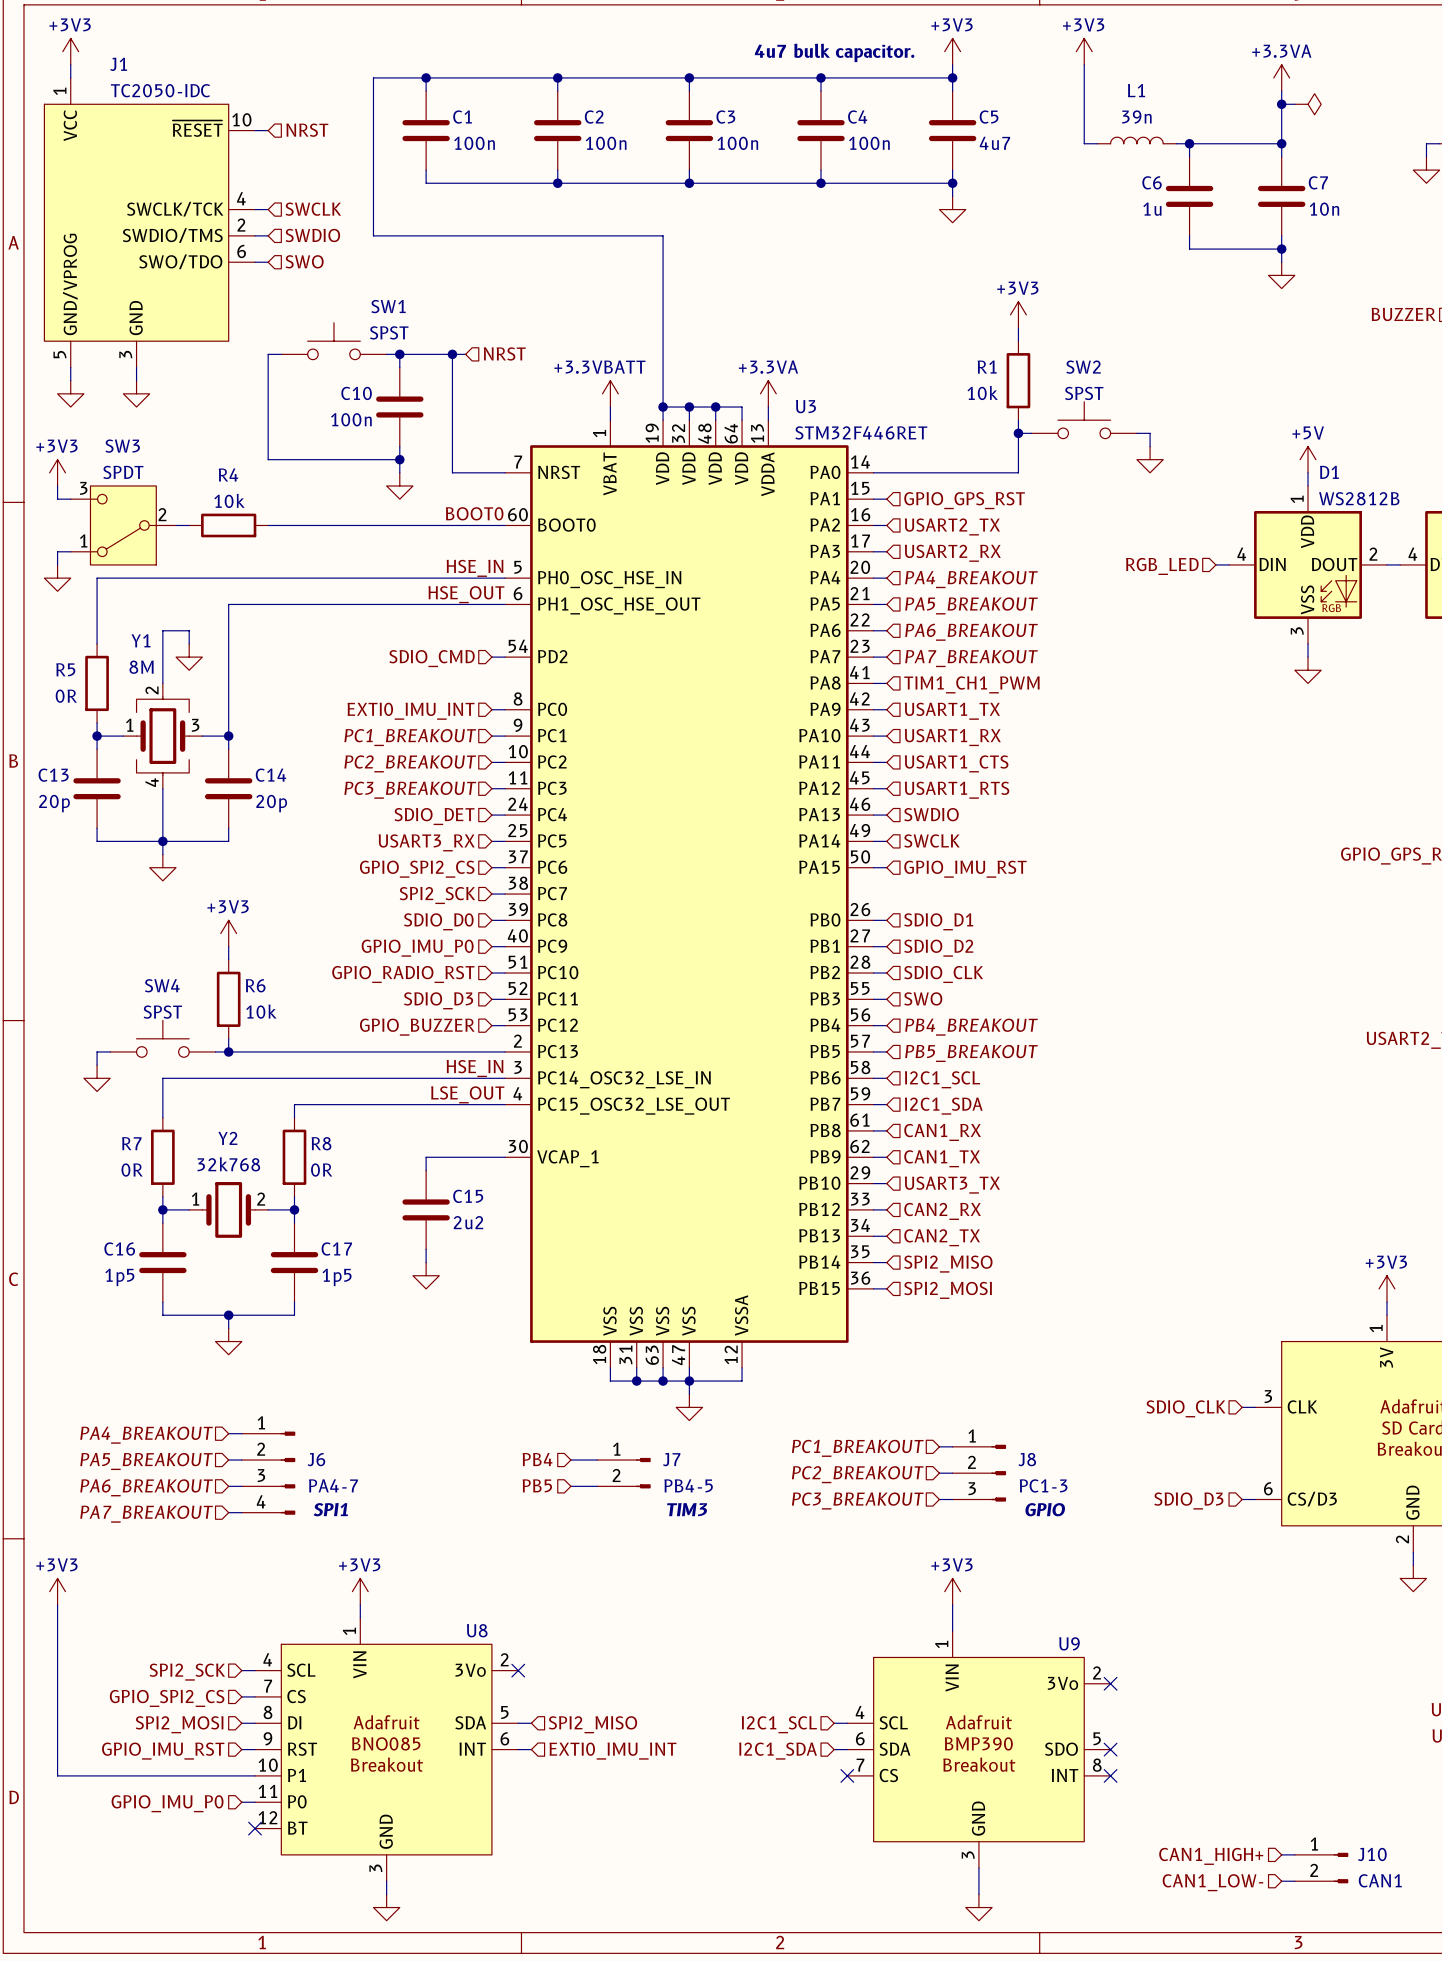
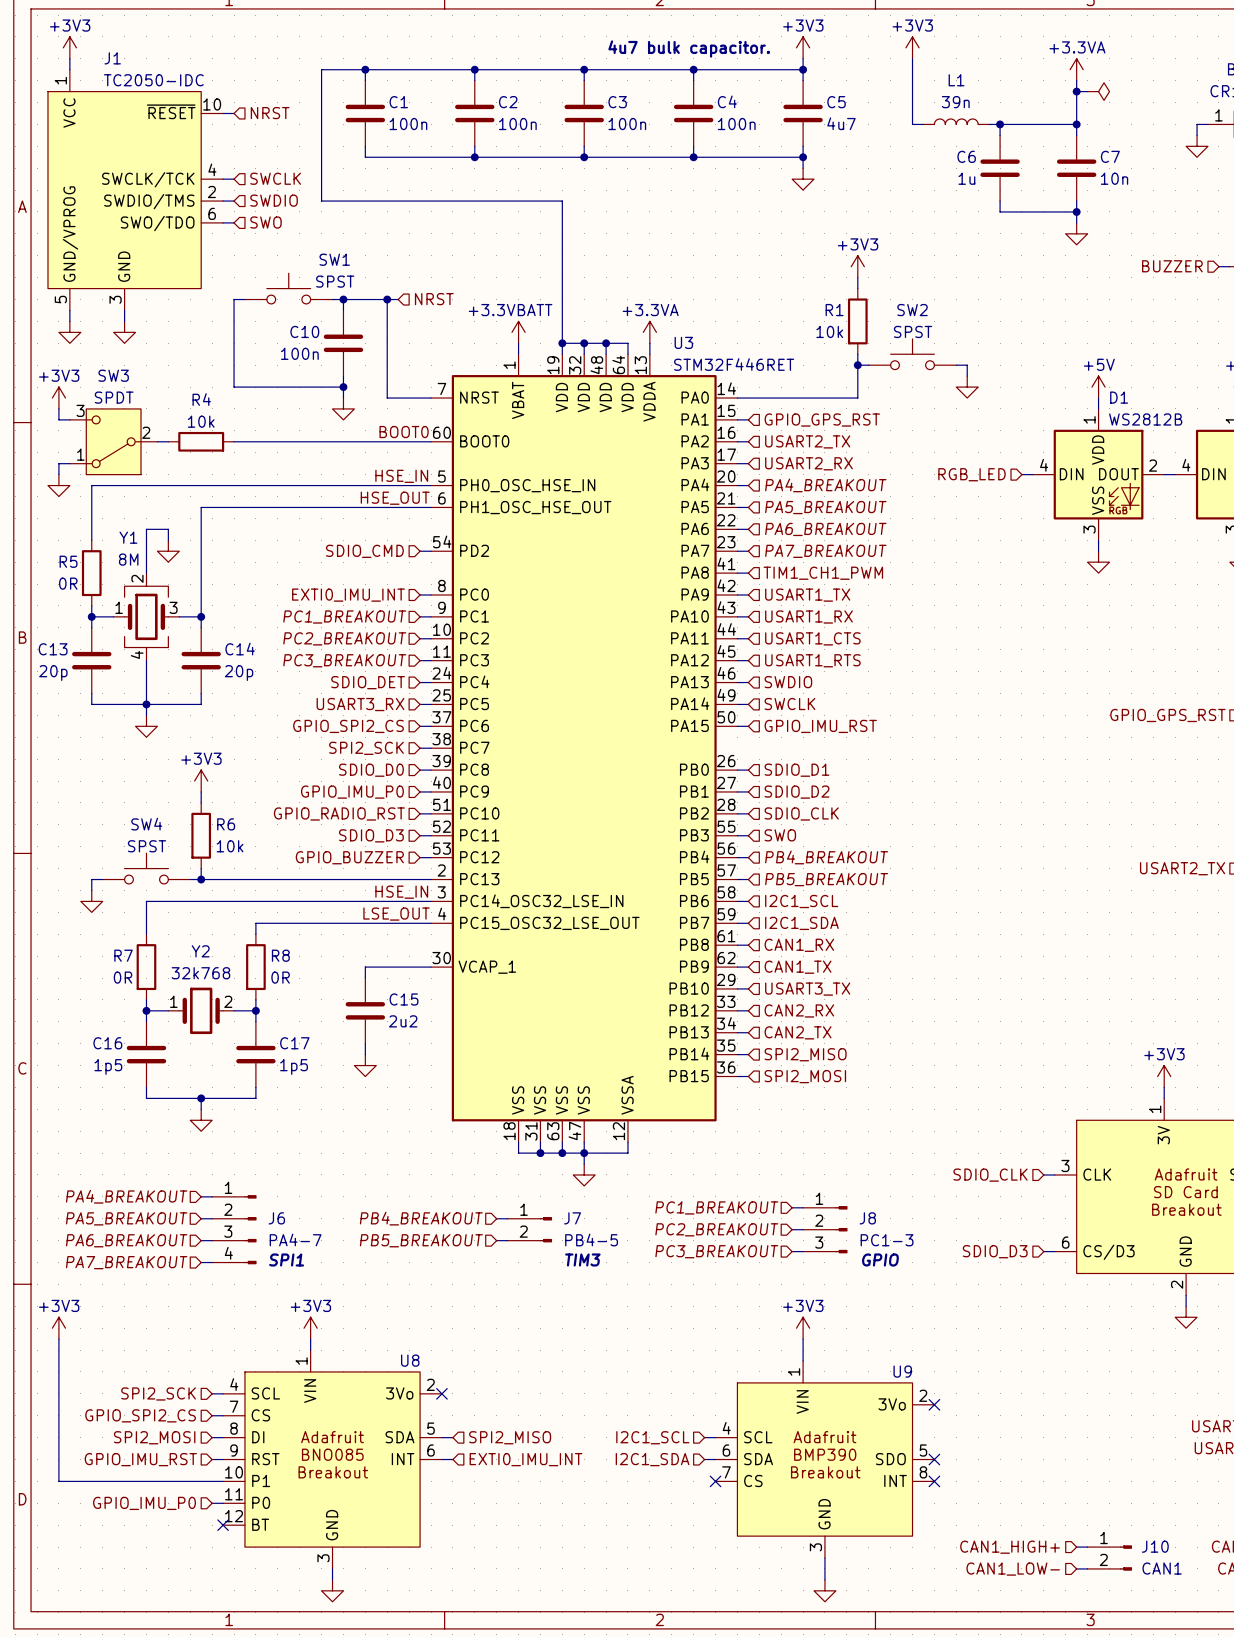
hierarchical label: PB4 (537, 1459) -> none
wire: (570, 1460) (584, 1460) -> none
hierarchical label: none -> PB4_BREAKOUT (421, 1218)
hierarchical label: PB5 (537, 1485) -> none
wire: (570, 1486) (584, 1486) -> none
hierarchical label: none -> PB5_BREAKOUT (421, 1240)

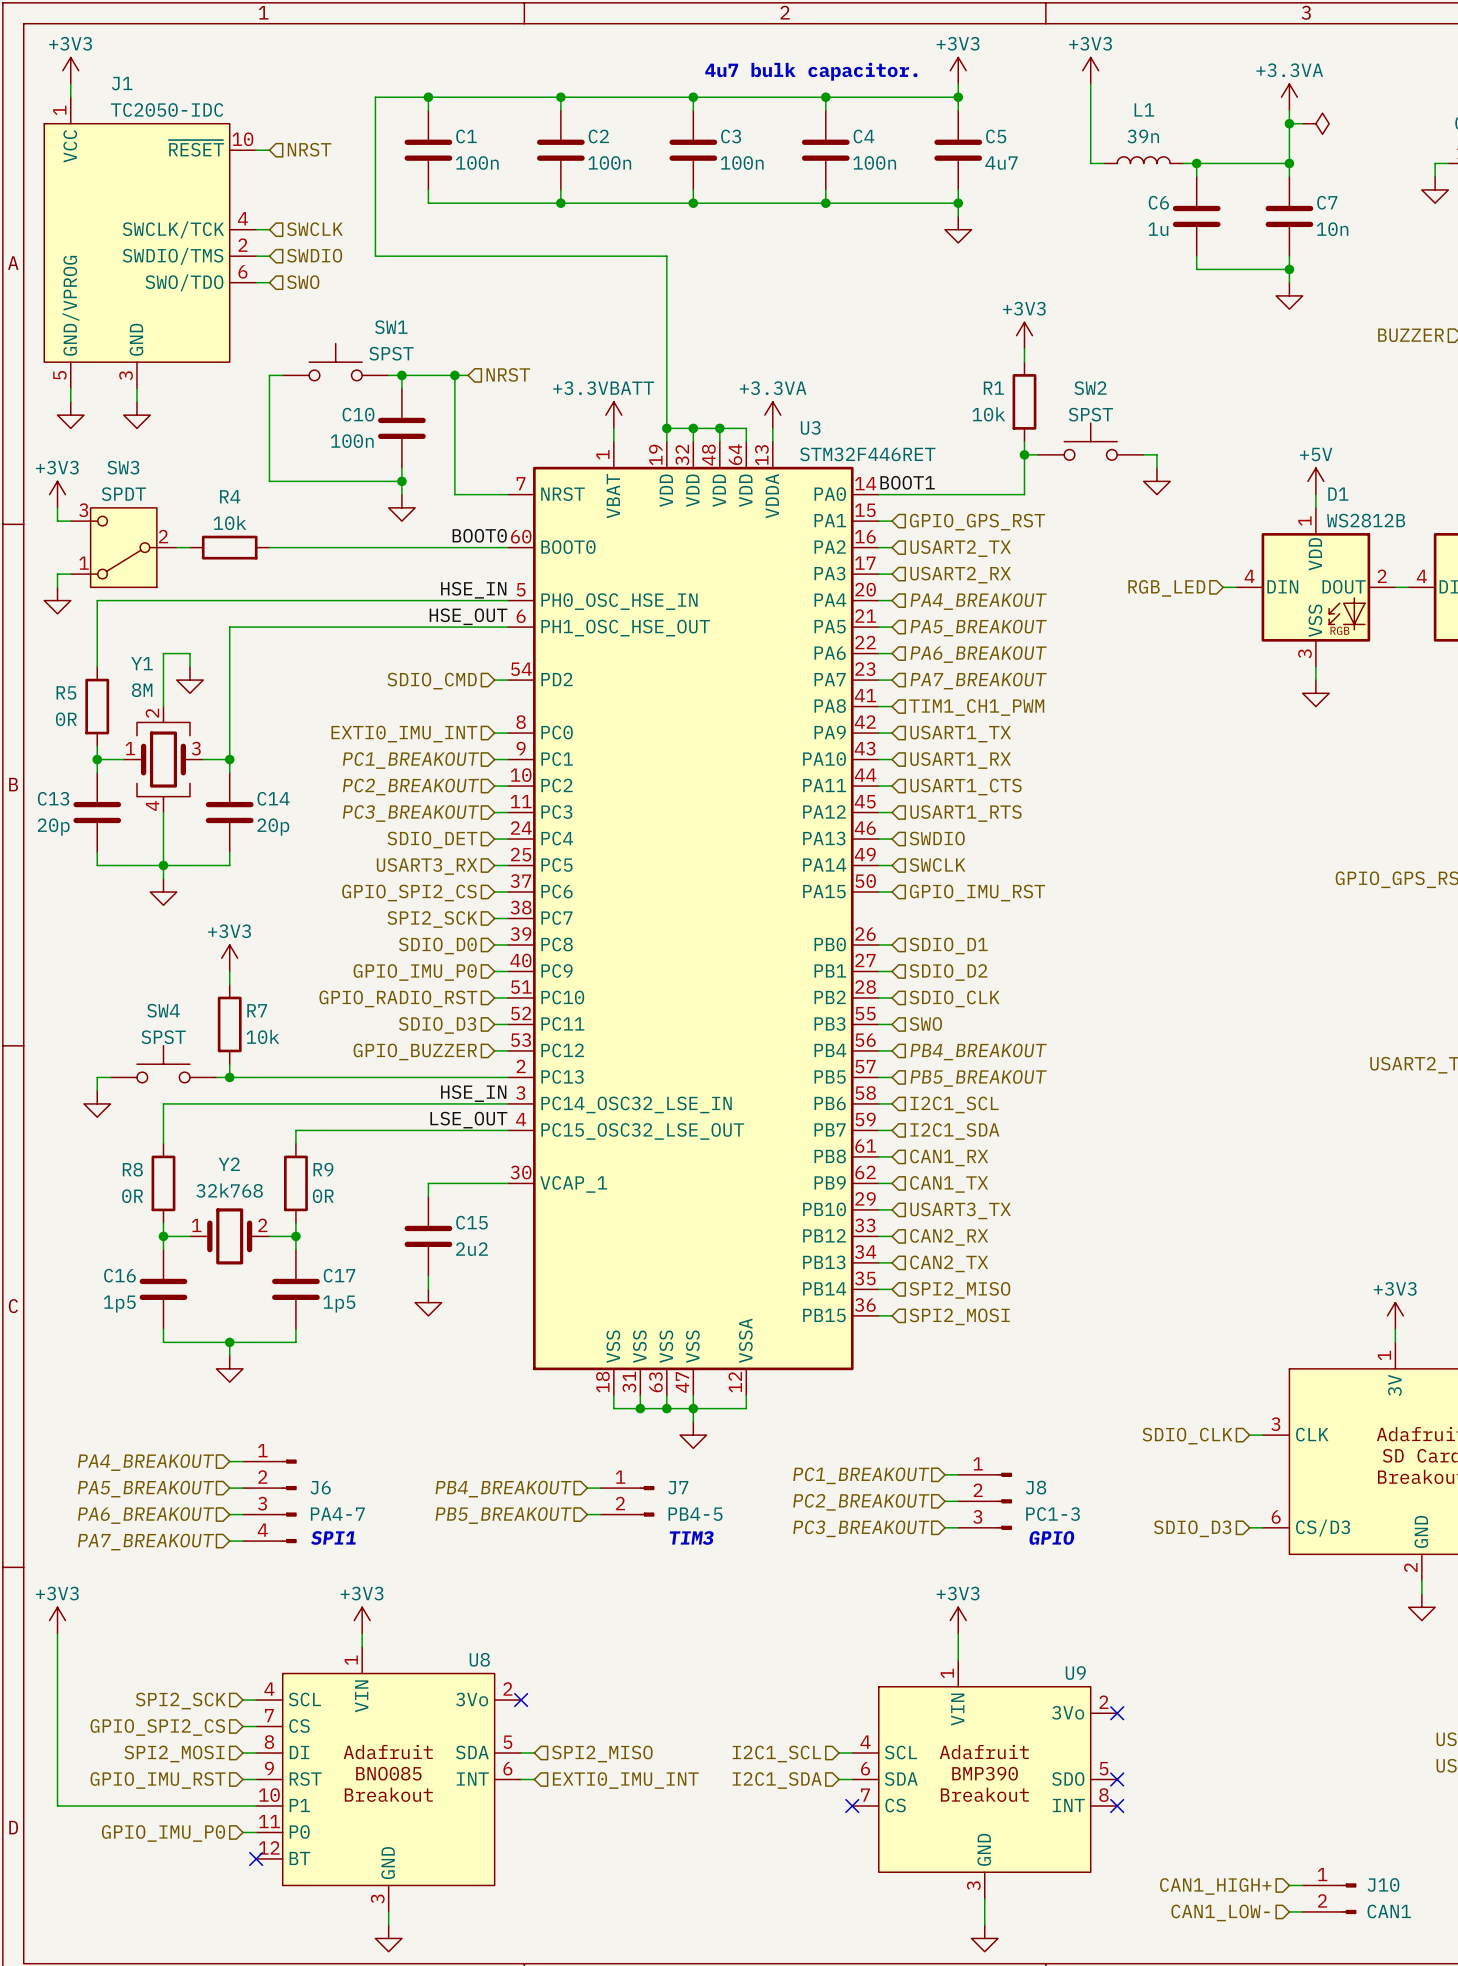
label: none -> BOOT1 (907, 482)
R6 name: R6 (226, 824) -> R7 (257, 1010)
R7 name: R7 (123, 955) -> R8 (132, 1169)
R8 name: R8 (280, 955) -> R9 (323, 1169)

